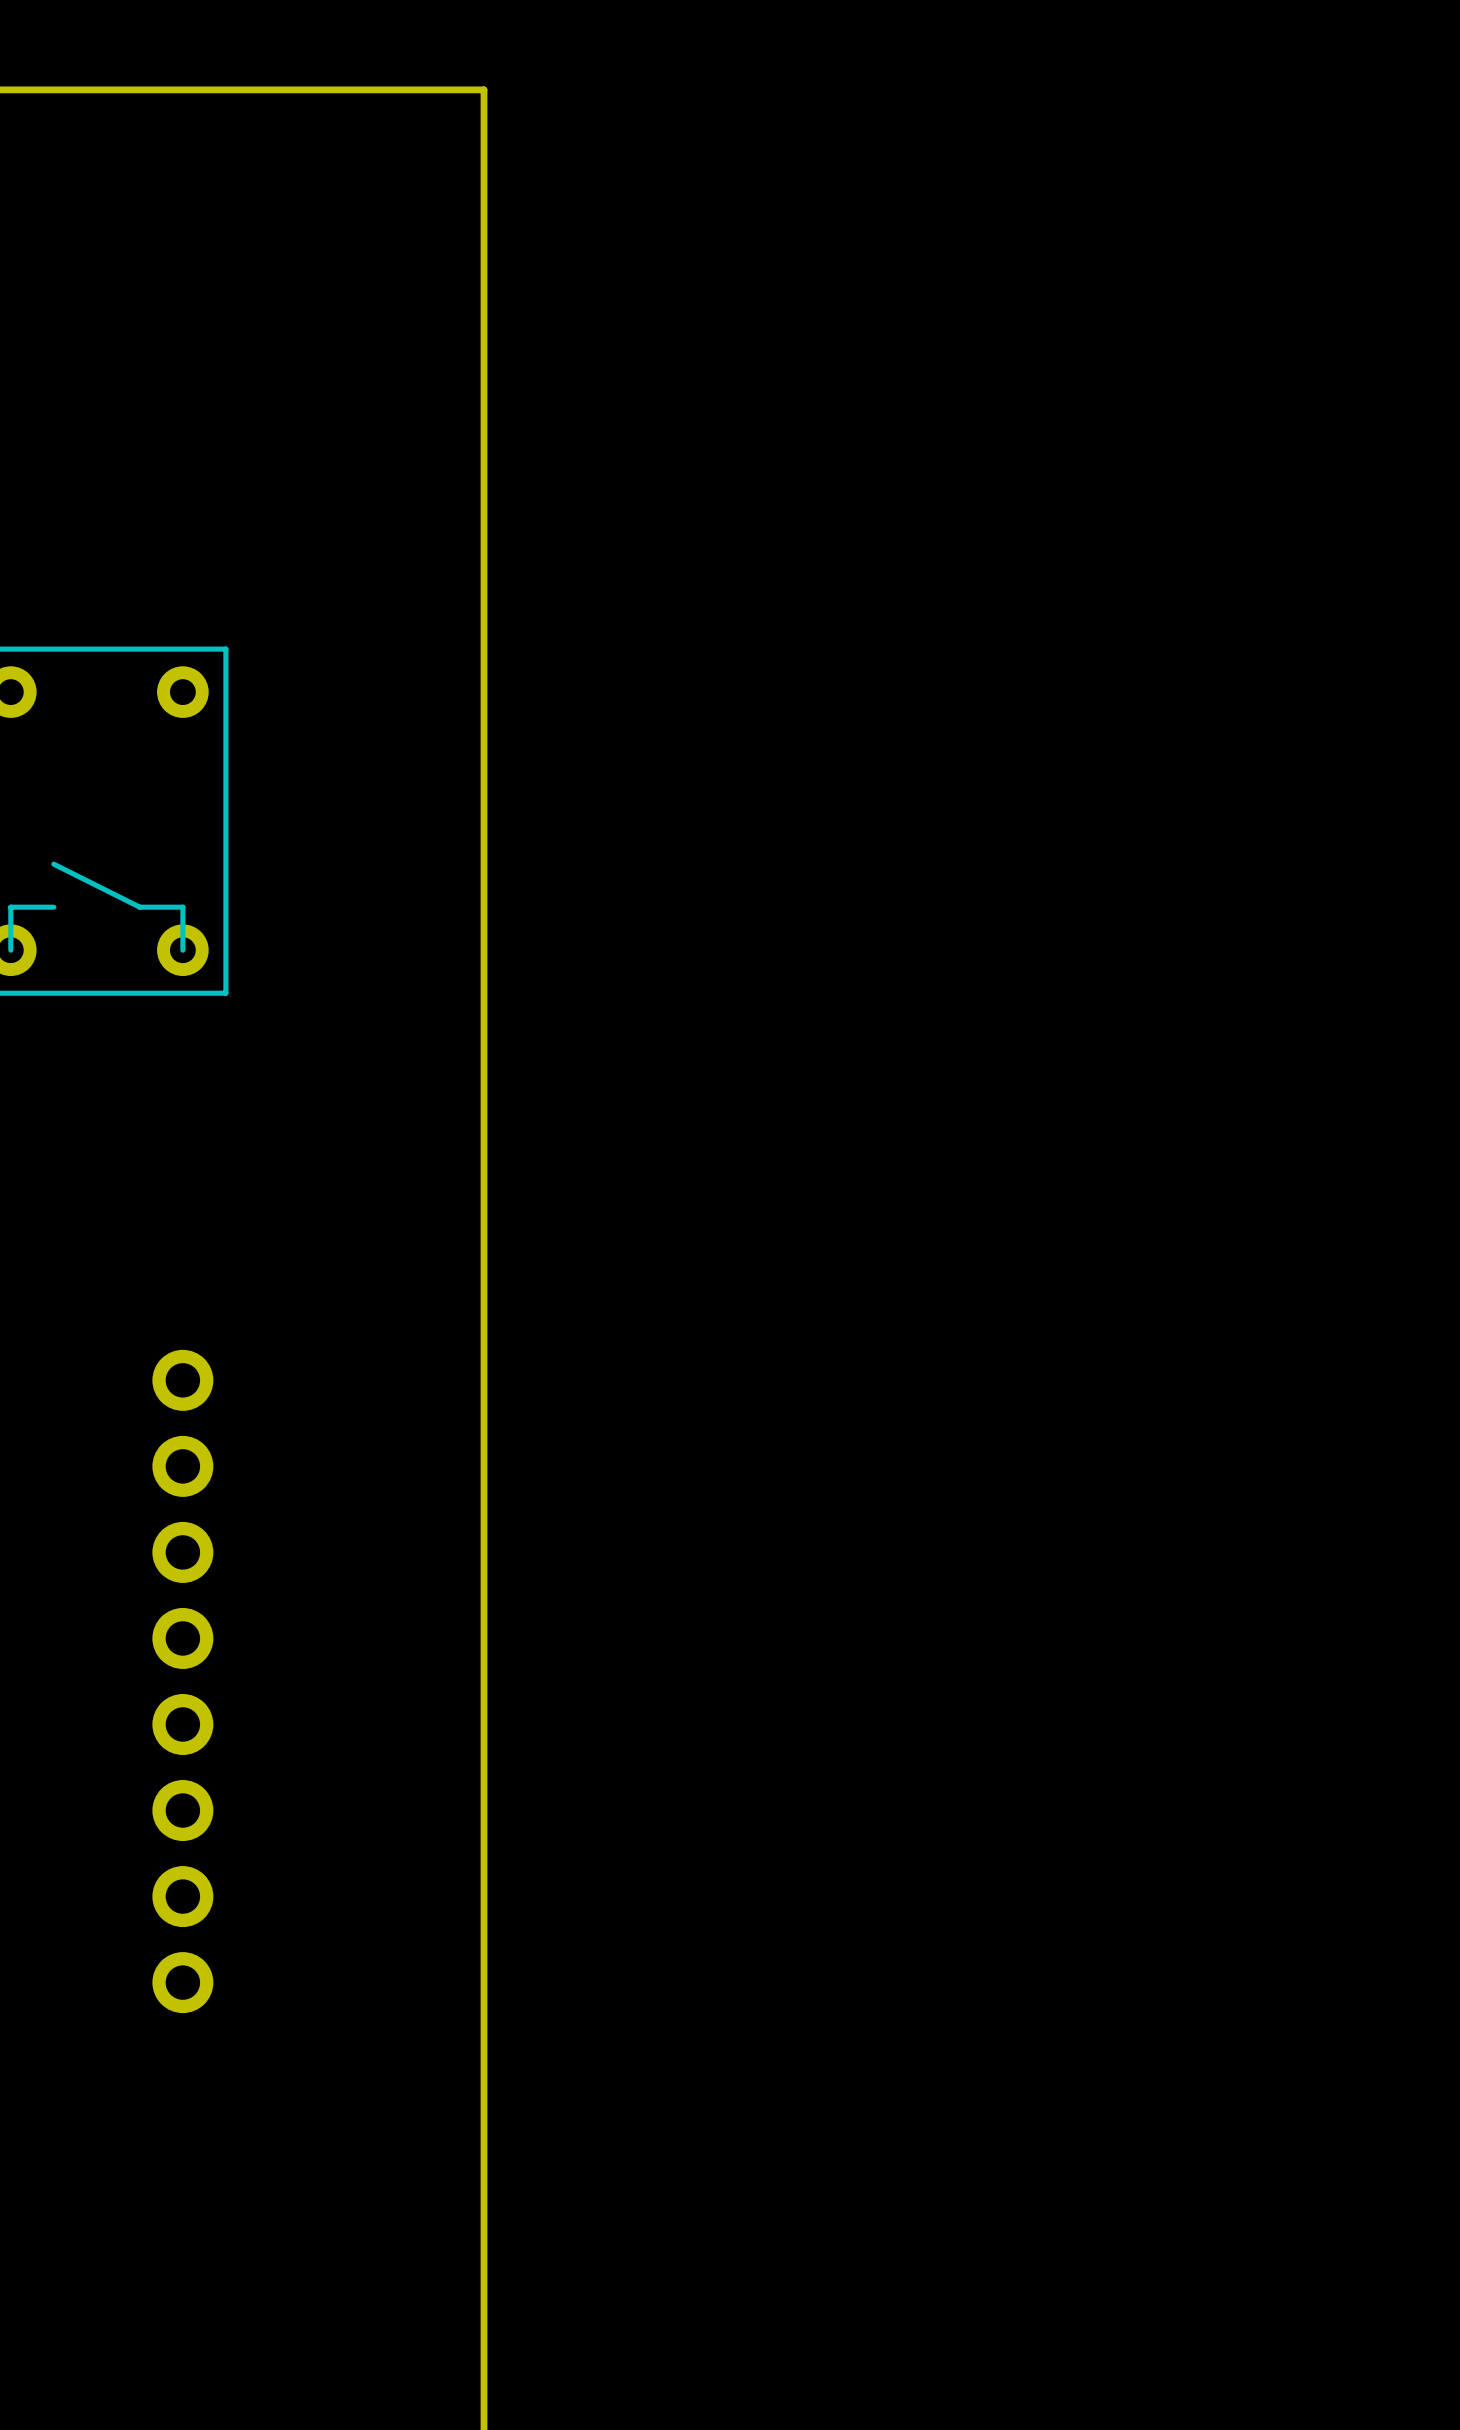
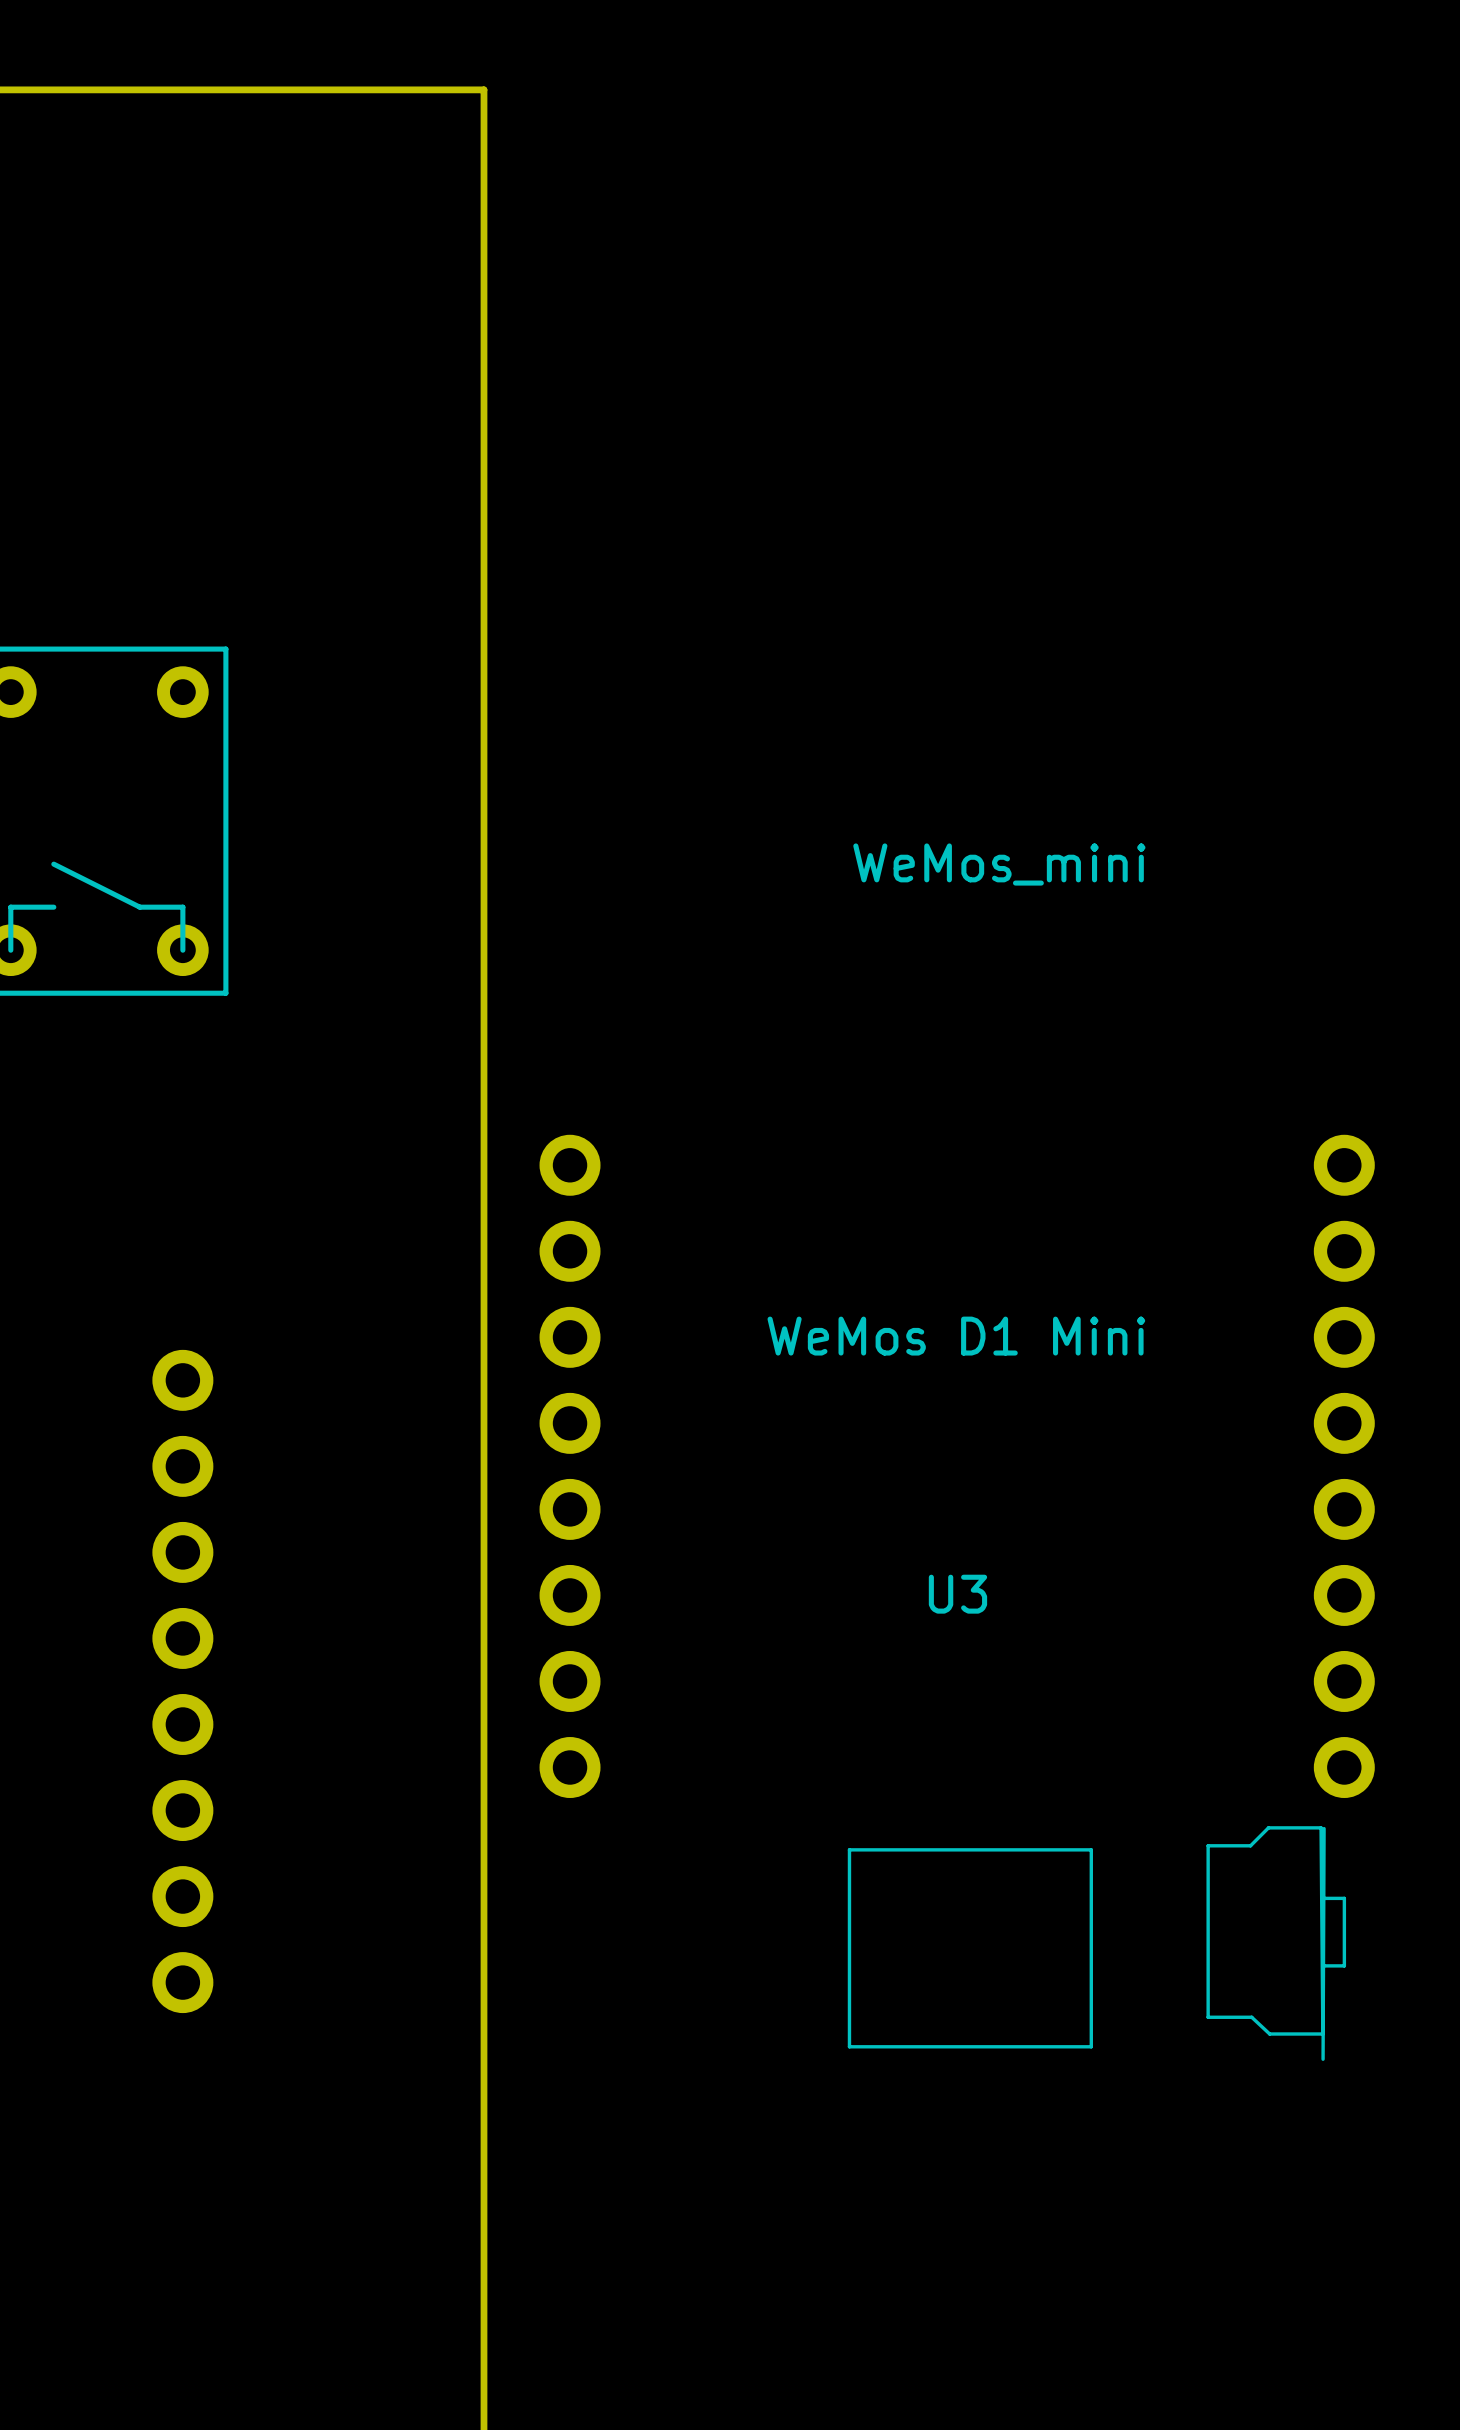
U3: none -> WeMos_mini (957, 1597)

